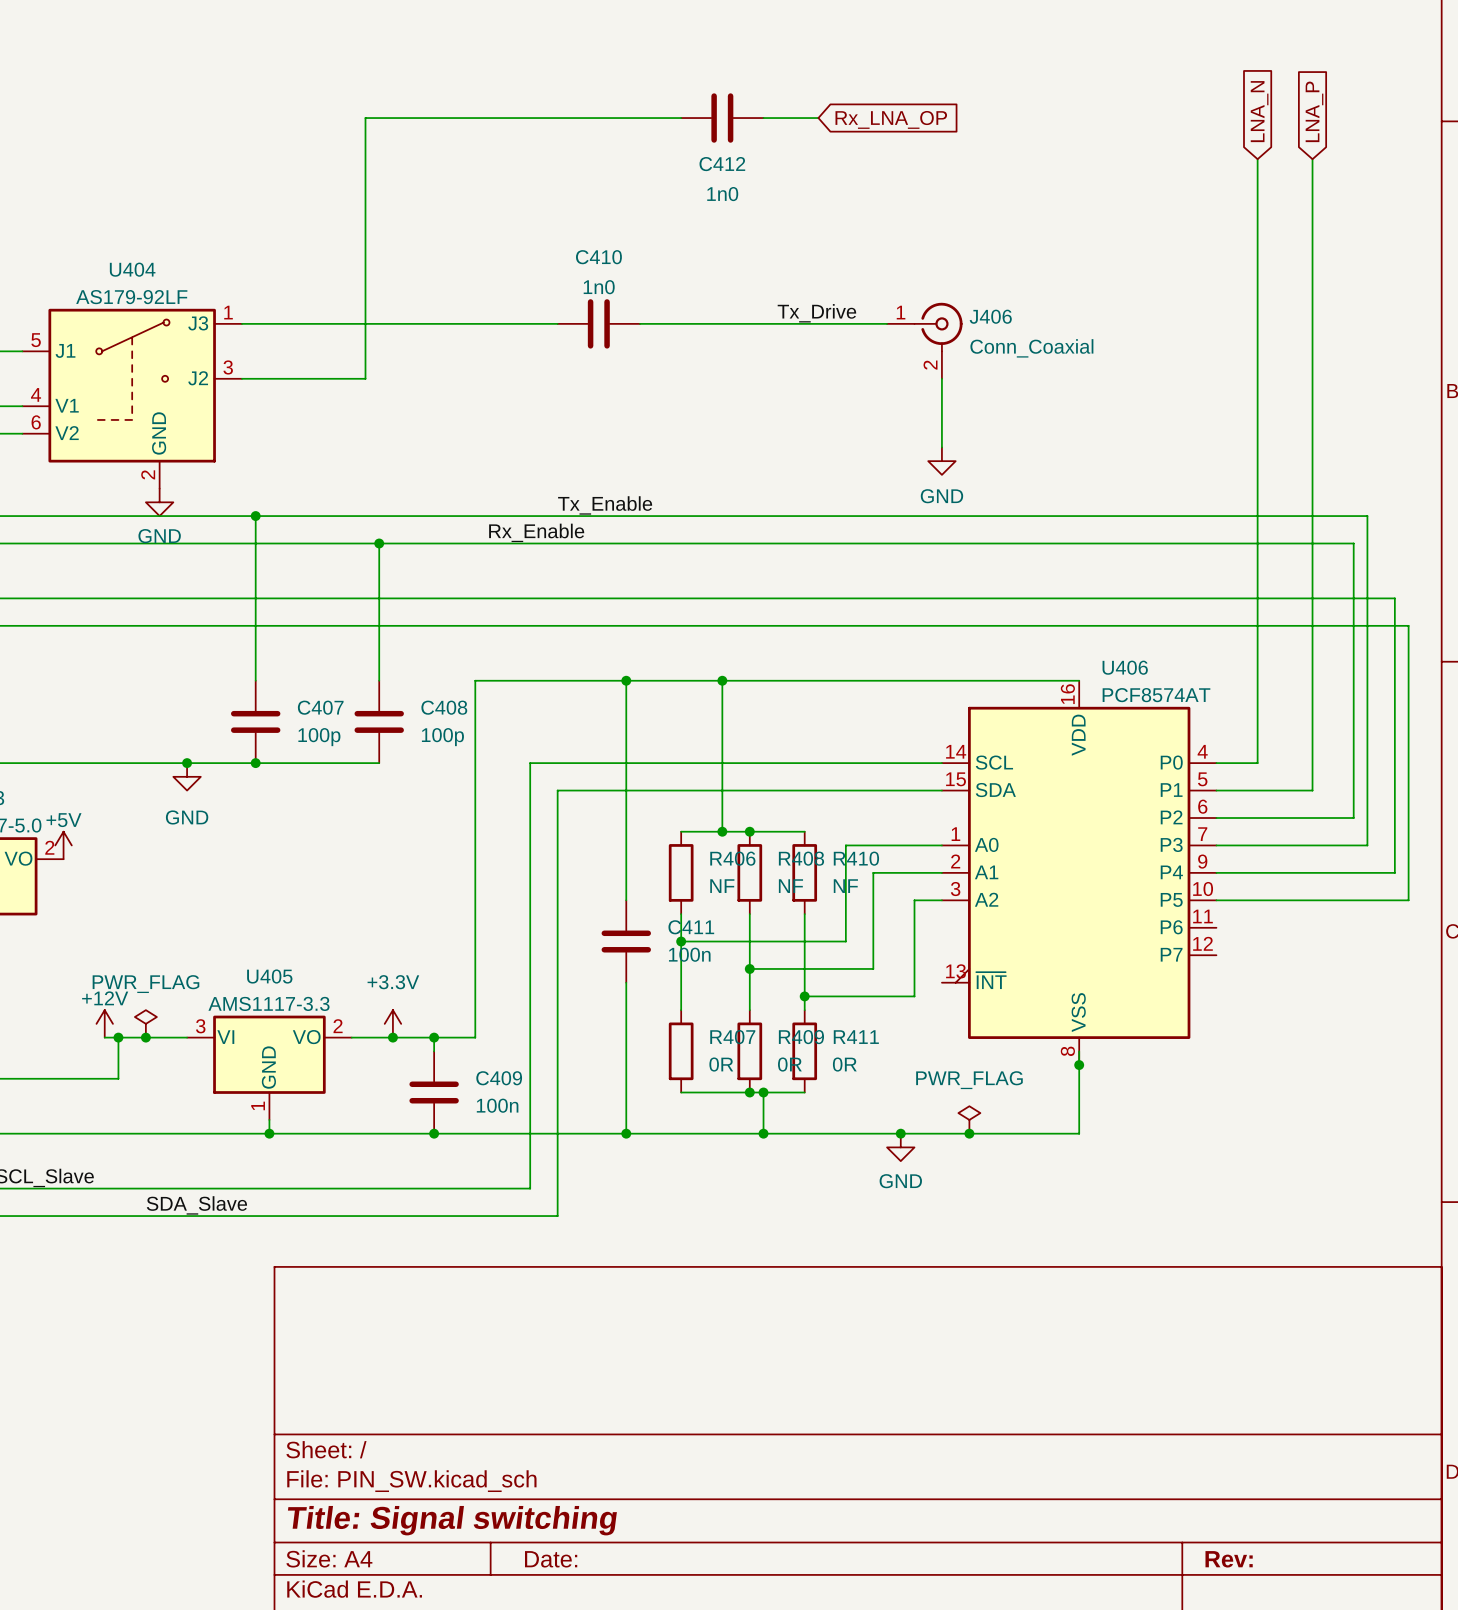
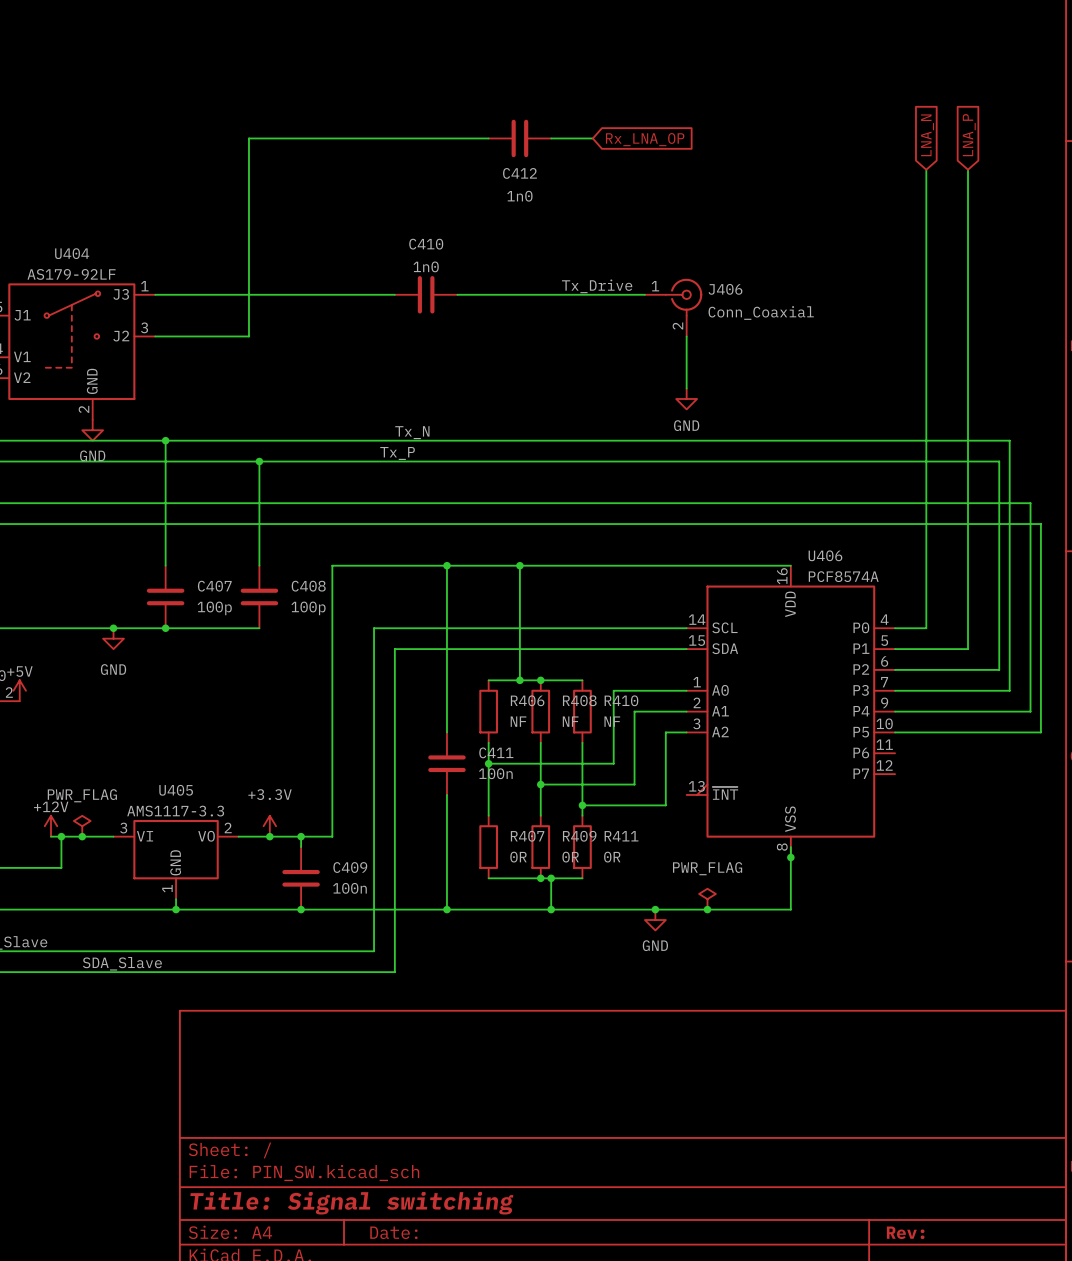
label: Tx_Enable (605, 505) -> Tx_N (412, 432)
label: Rx_Enable (536, 532) -> Tx_P (397, 453)
U406 value: PCF8574AT (1156, 695) -> PCF8574A (843, 576)

